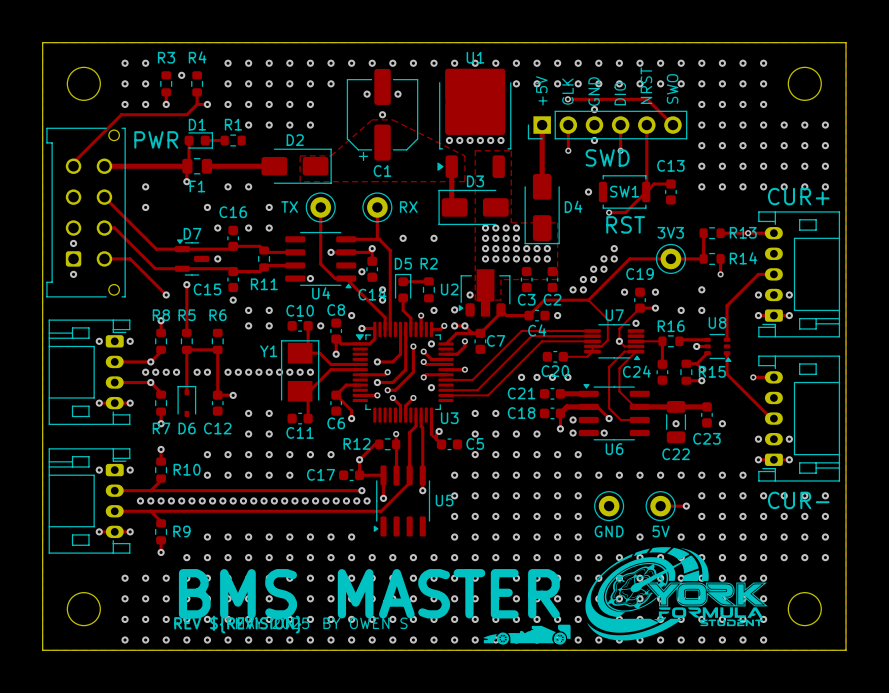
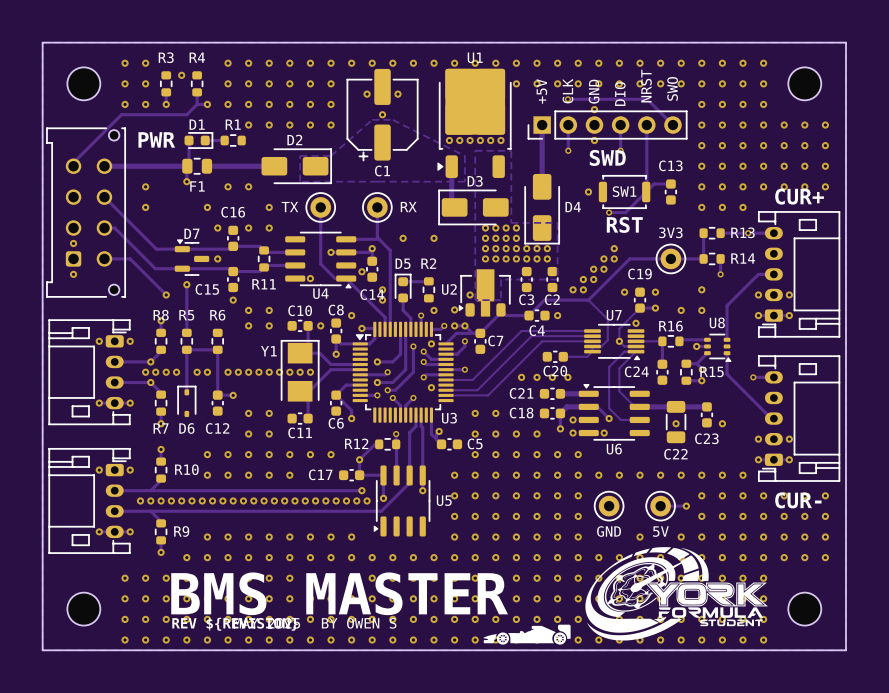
via: none -> (331, 104)
via: none -> (331, 125)
via: none -> (701, 207)
via: none -> (722, 207)
via: none -> (743, 207)

